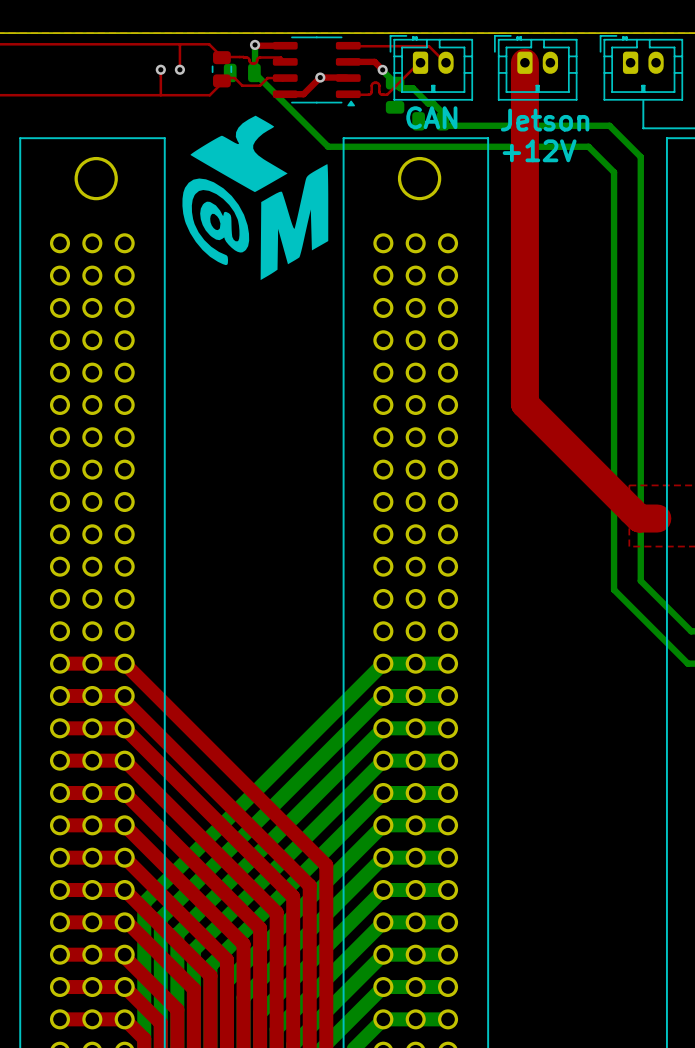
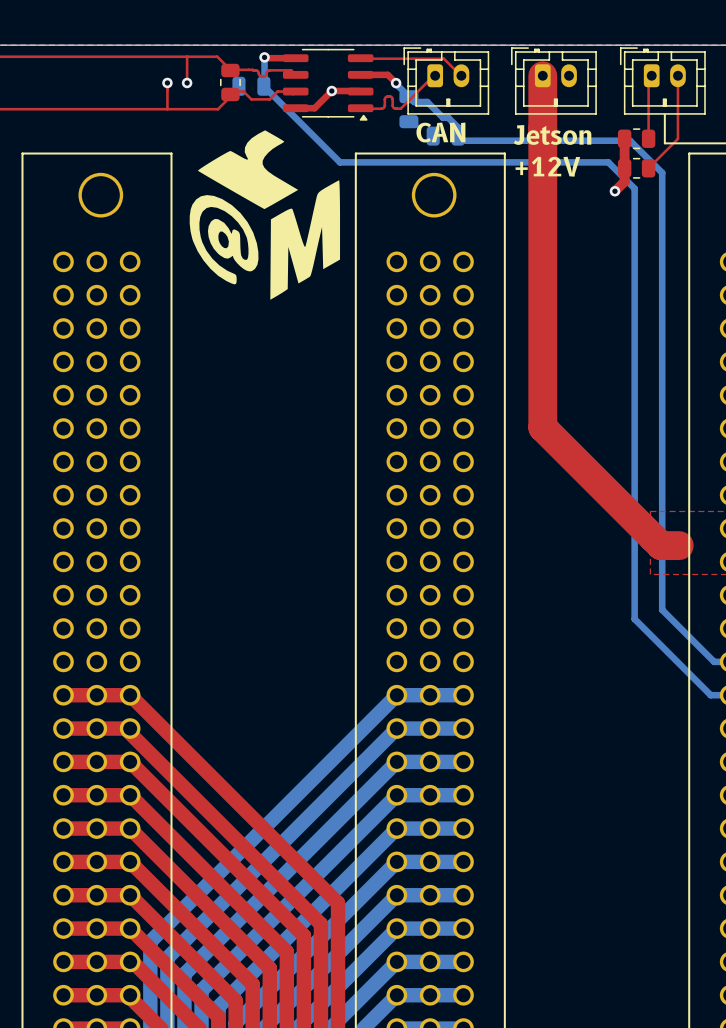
top track: none -> (651, 75) (648, 78) (648, 138)
top track: none -> (677, 75) (677, 138) (648, 168)
top track: none -> (624, 138) (624, 181) (614, 191)
part: none -> (636, 138)
part: none -> (636, 168)
via: none -> (614, 191)

